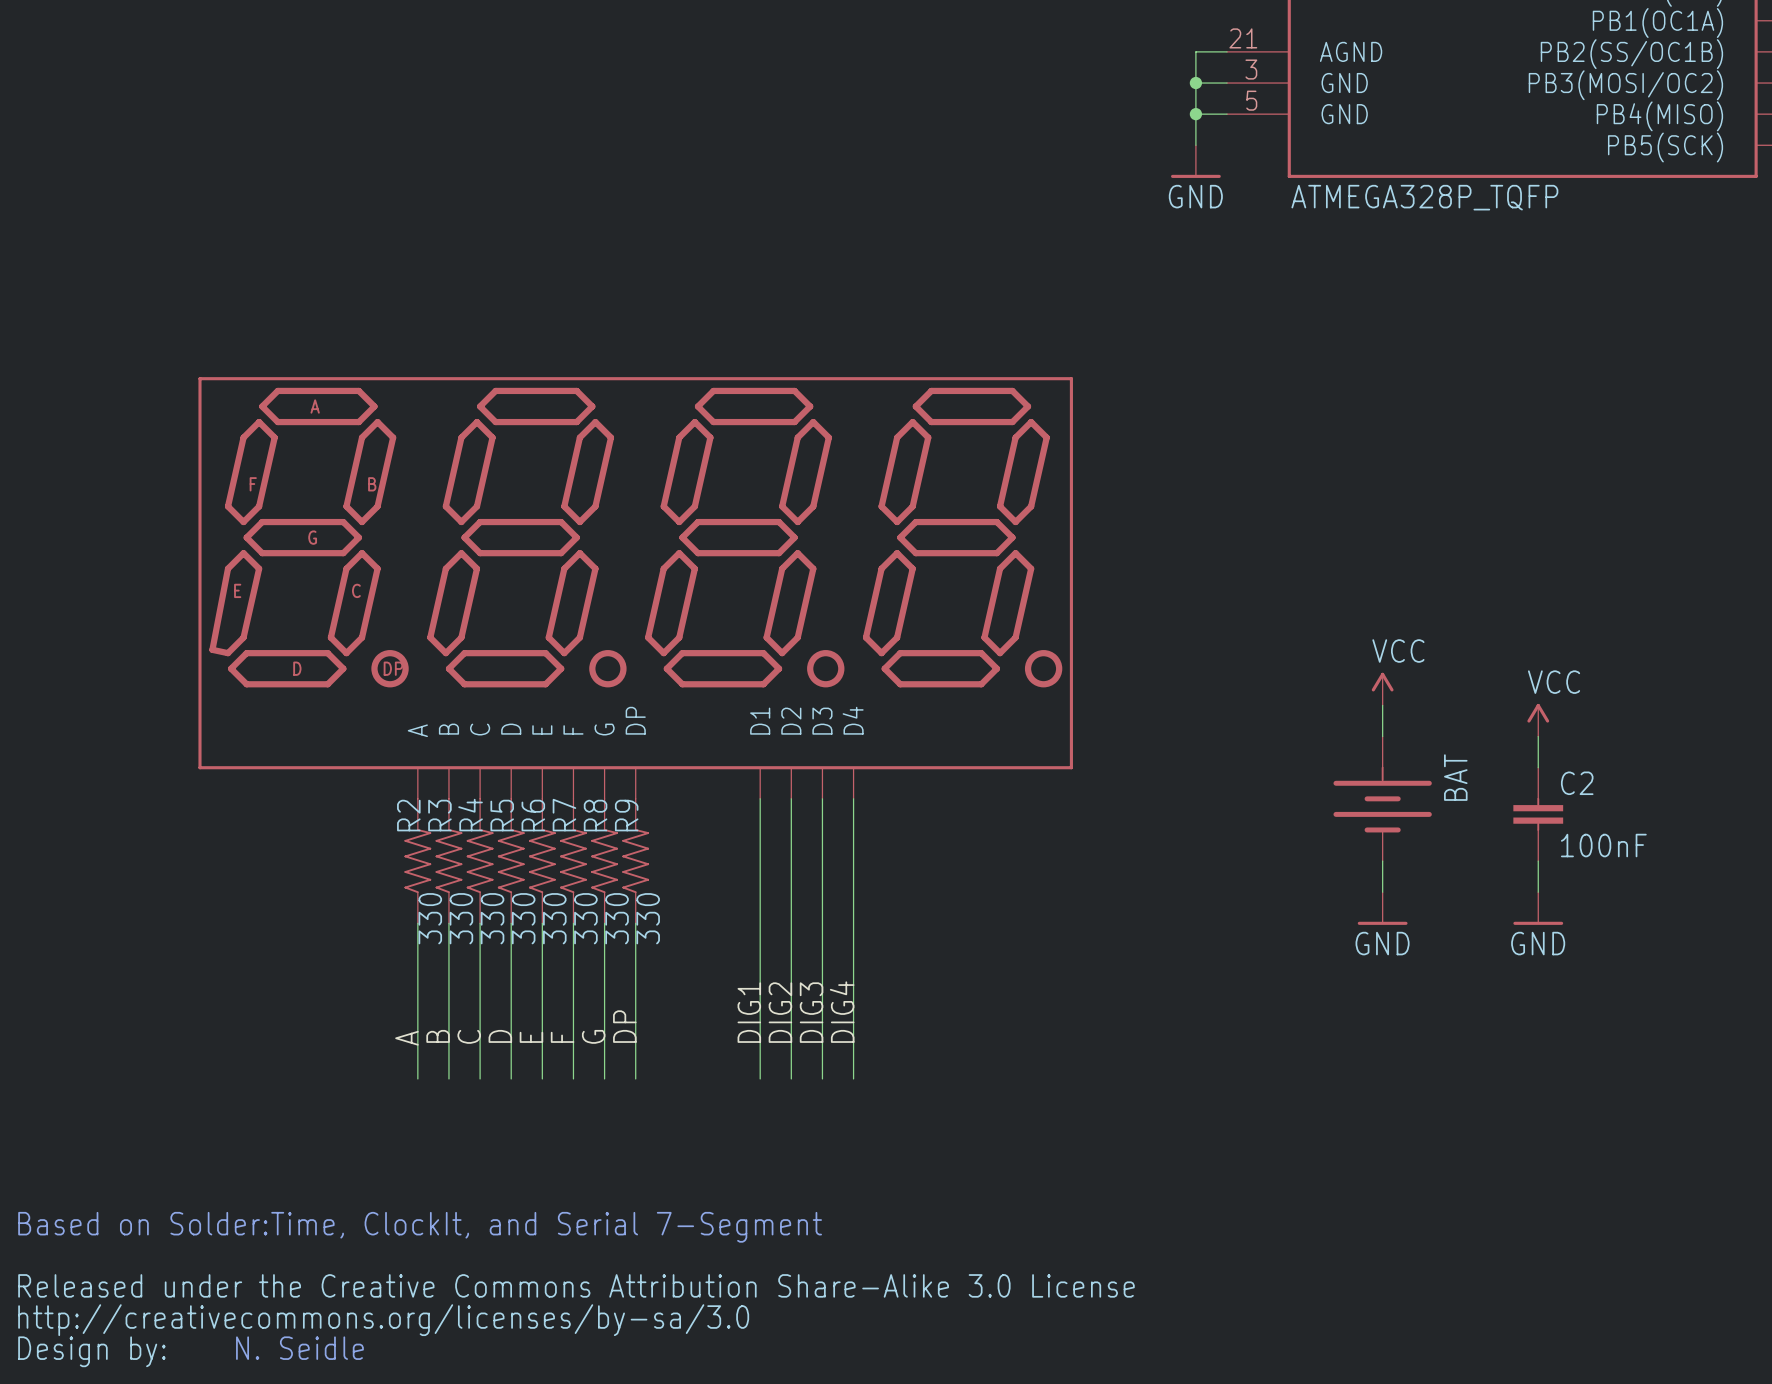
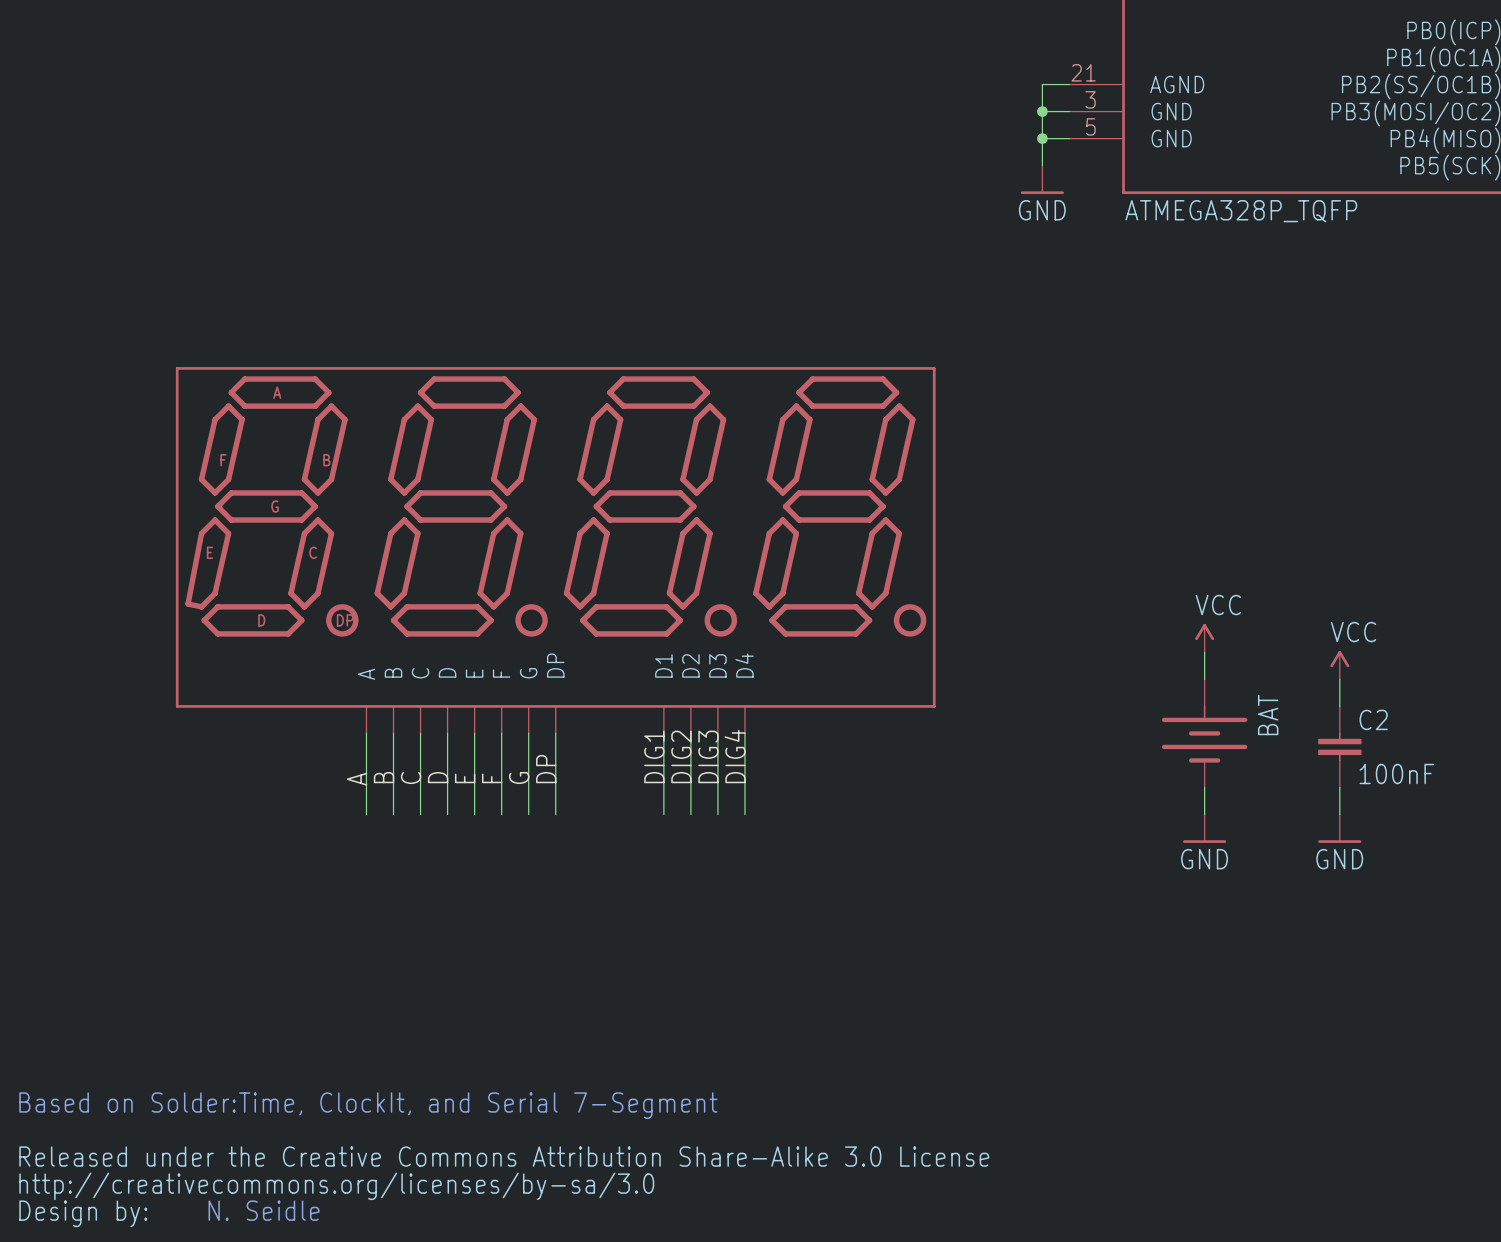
wire: none -> (366, 733) (366, 814)
wire: none -> (393, 733) (393, 814)
wire: none -> (420, 733) (420, 814)
wire: none -> (447, 733) (447, 814)
wire: none -> (474, 733) (474, 814)
wire: none -> (501, 733) (501, 814)
wire: none -> (528, 733) (528, 814)
wire: none -> (555, 733) (555, 814)
R2: 330 (417, 861) -> none
R3: 330 (448, 861) -> none
R4: 330 (480, 861) -> none
R5: 330 (511, 861) -> none
R6: 330 (542, 861) -> none
R7: 330 (573, 861) -> none
R8: 330 (604, 861) -> none
R9: 330 (635, 861) -> none
wire: (760, 892) (760, 1078) -> none
wire: (791, 892) (791, 1078) -> none
wire: (822, 892) (822, 1078) -> none
wire: (853, 892) (853, 1078) -> none
wire: (417, 923) (417, 1078) -> none
wire: (448, 923) (448, 1078) -> none
wire: (480, 923) (480, 1078) -> none
wire: (511, 923) (511, 1078) -> none
wire: (542, 923) (542, 1078) -> none
wire: (573, 923) (573, 1078) -> none
wire: (604, 923) (604, 1078) -> none
wire: (635, 923) (635, 1078) -> none
label position: DIG1 (749, 1012) -> DIG1 (654, 756)
label position: DIG2 (780, 1012) -> DIG2 (681, 756)
label position: DIG3 (811, 1012) -> DIG3 (708, 756)
label position: DIG4 (842, 1012) -> DIG4 (735, 756)
label position: DP (624, 1026) -> DP (546, 769)
label position: B (438, 1036) -> B (384, 777)
label position: C (469, 1036) -> C (411, 778)
label position: D (500, 1036) -> D (438, 777)
label position: G (593, 1036) -> G (519, 778)
label position: E (531, 1037) -> E (465, 778)
label position: F (562, 1037) -> F (492, 778)
label position: A (406, 1038) -> A (357, 779)

